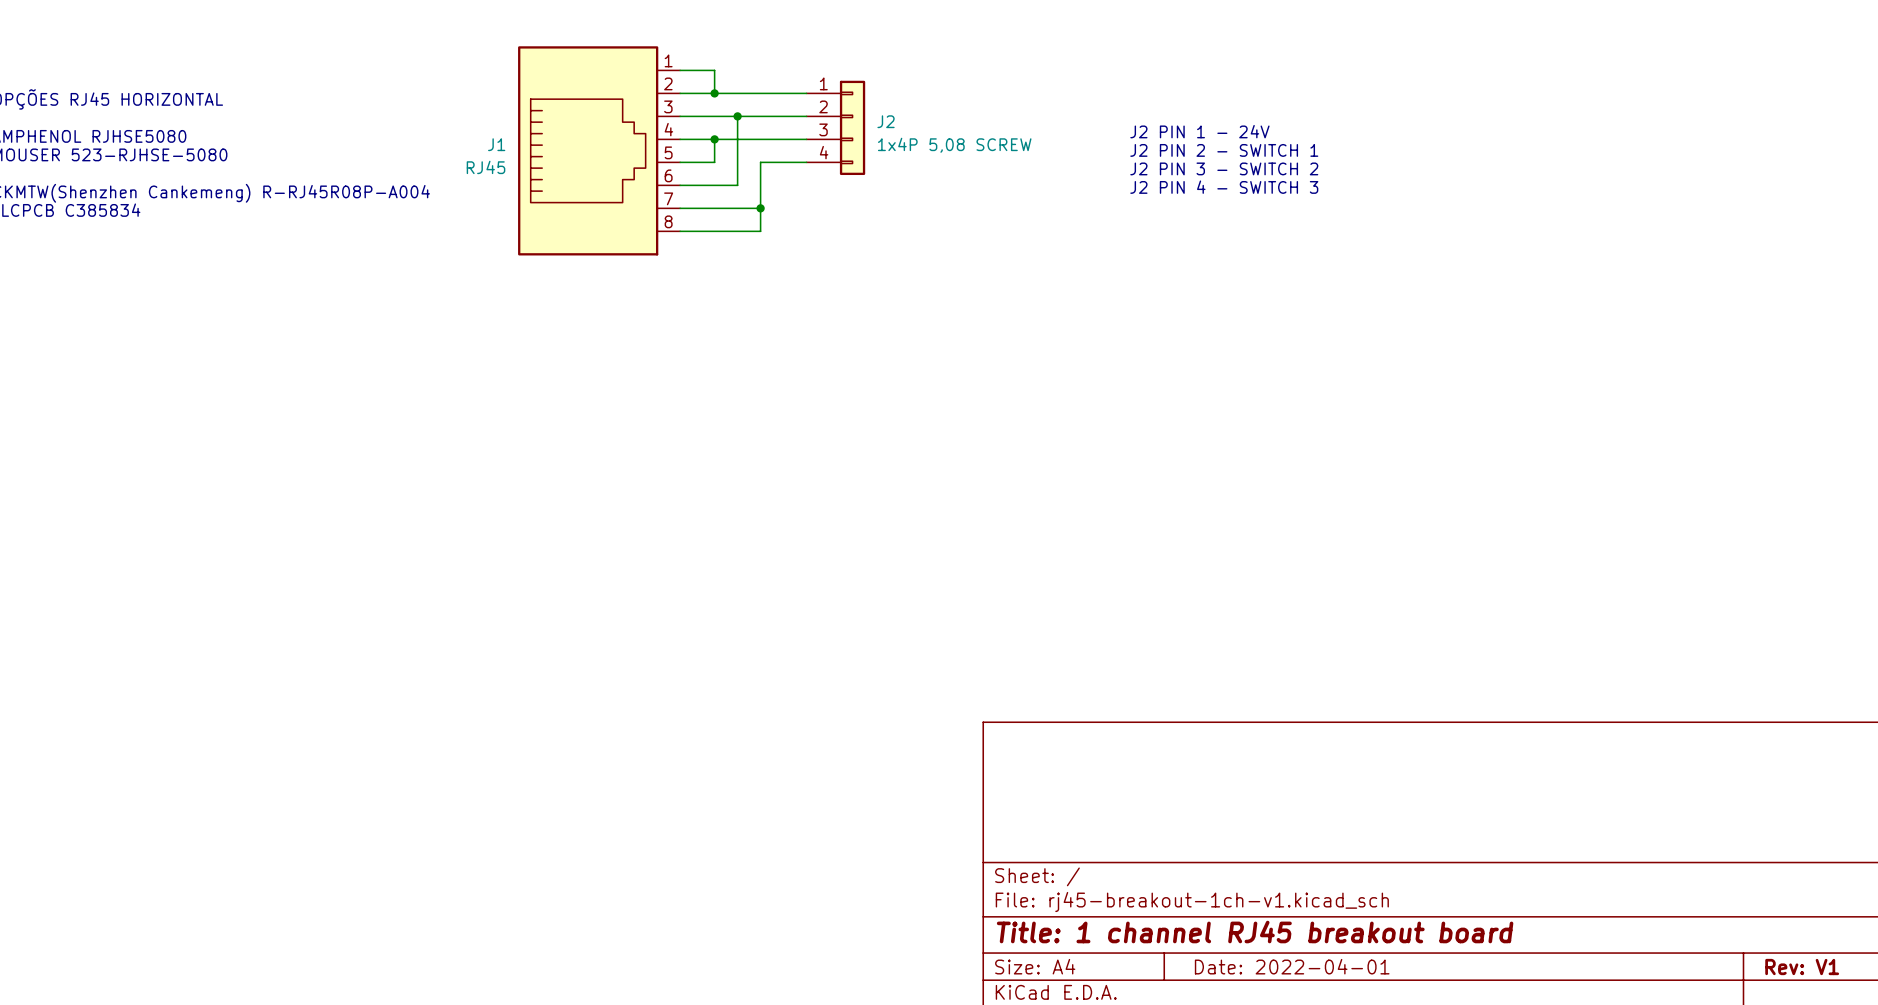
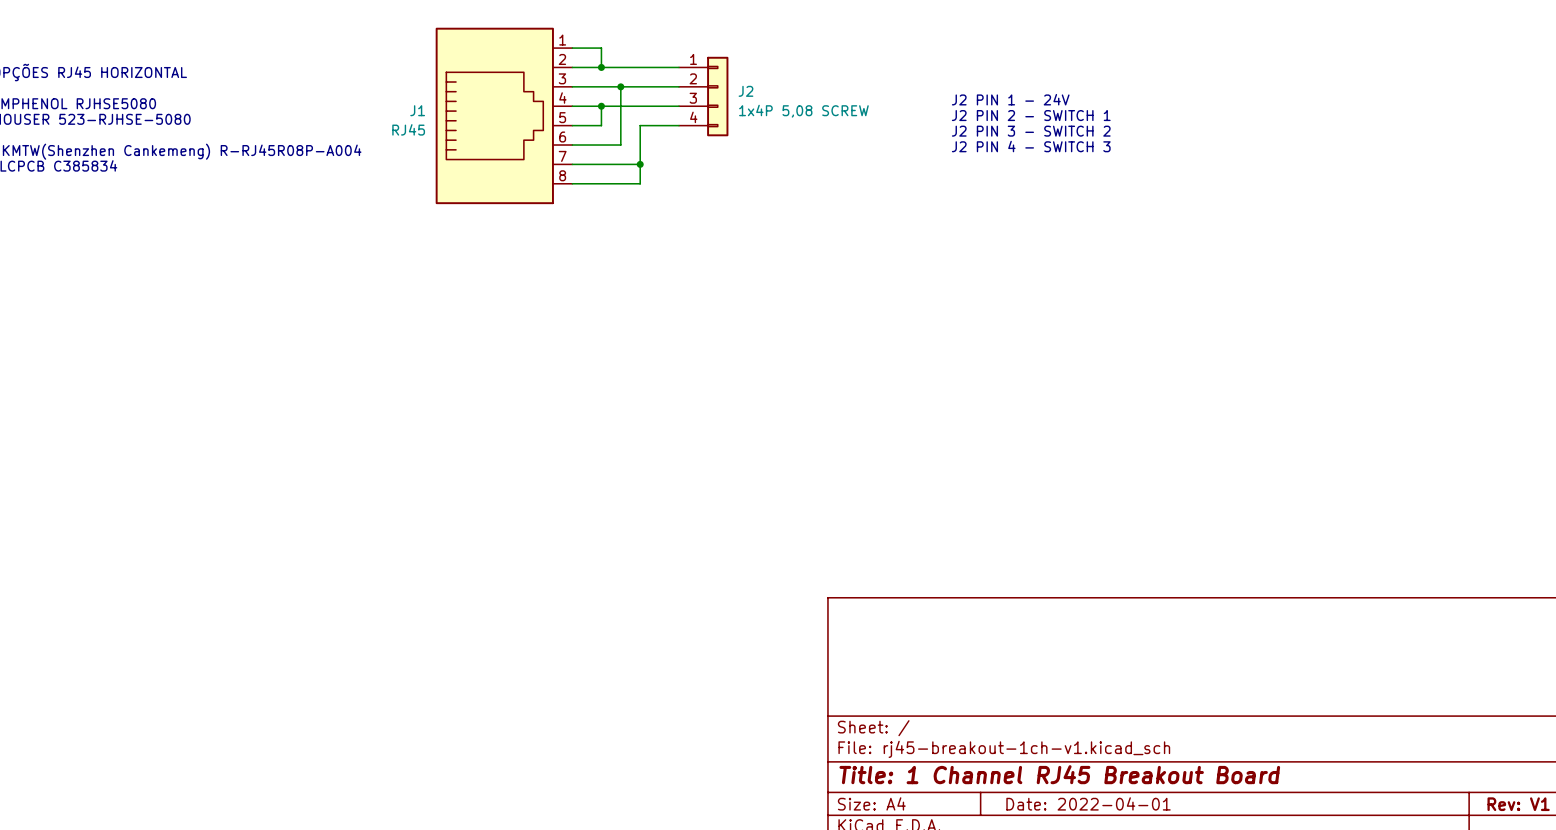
title block: Title: 1 channel RJ45 breakout board (1255, 932) -> Title: 1 Channel RJ45 Breakout Board (1059, 774)

